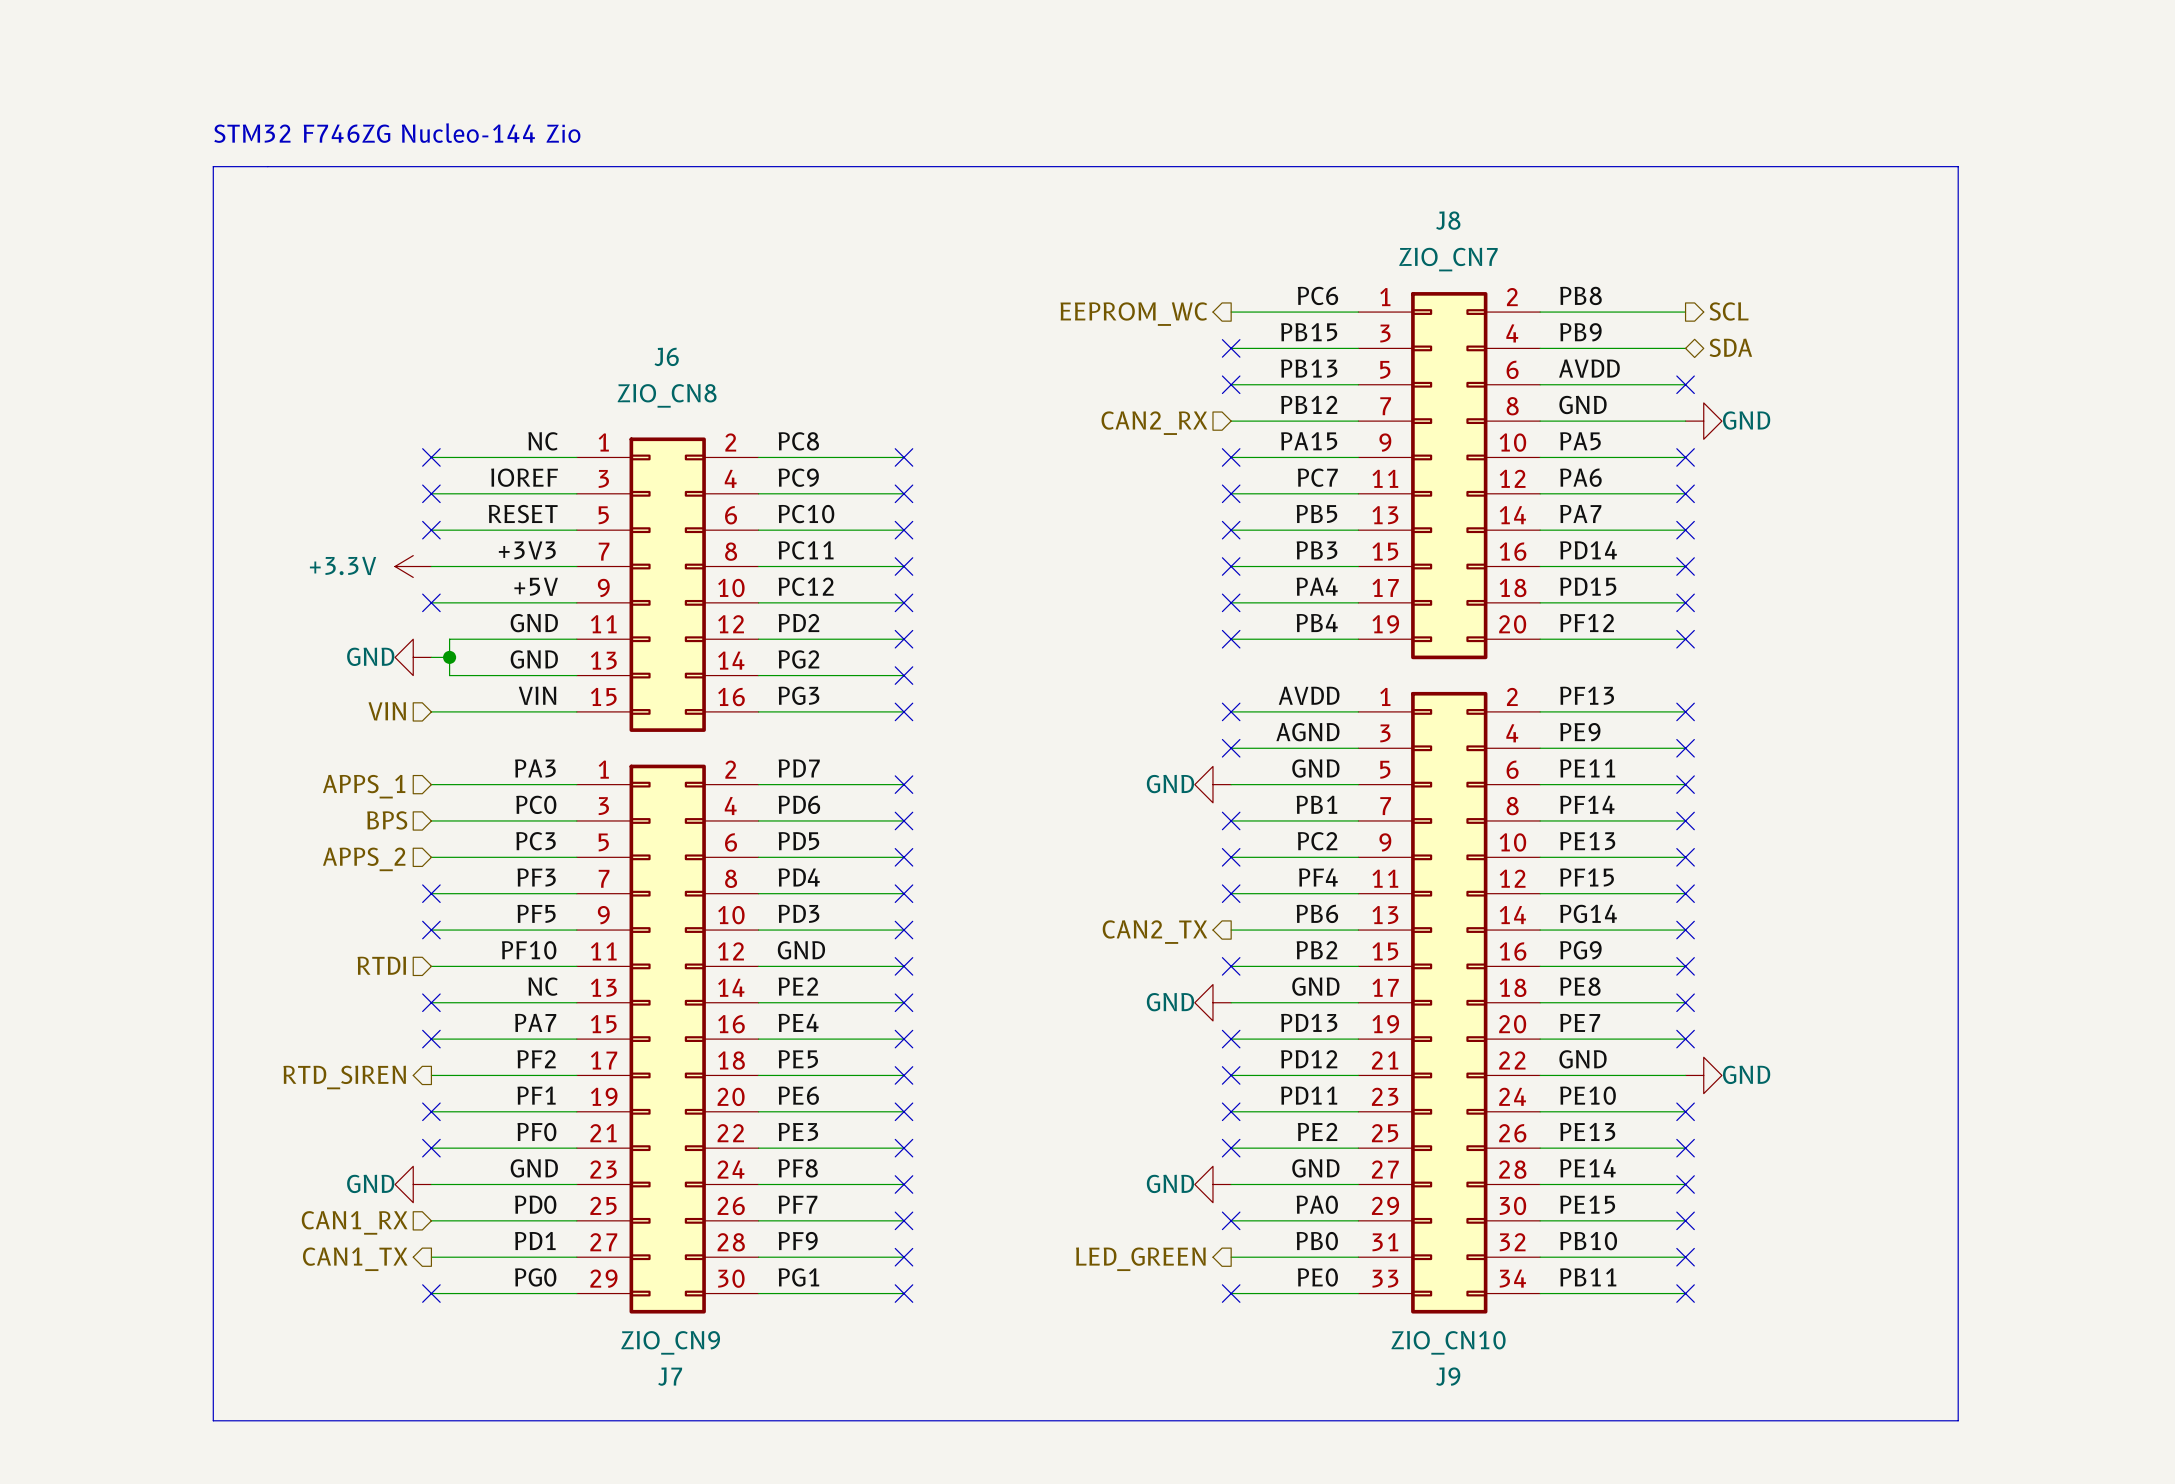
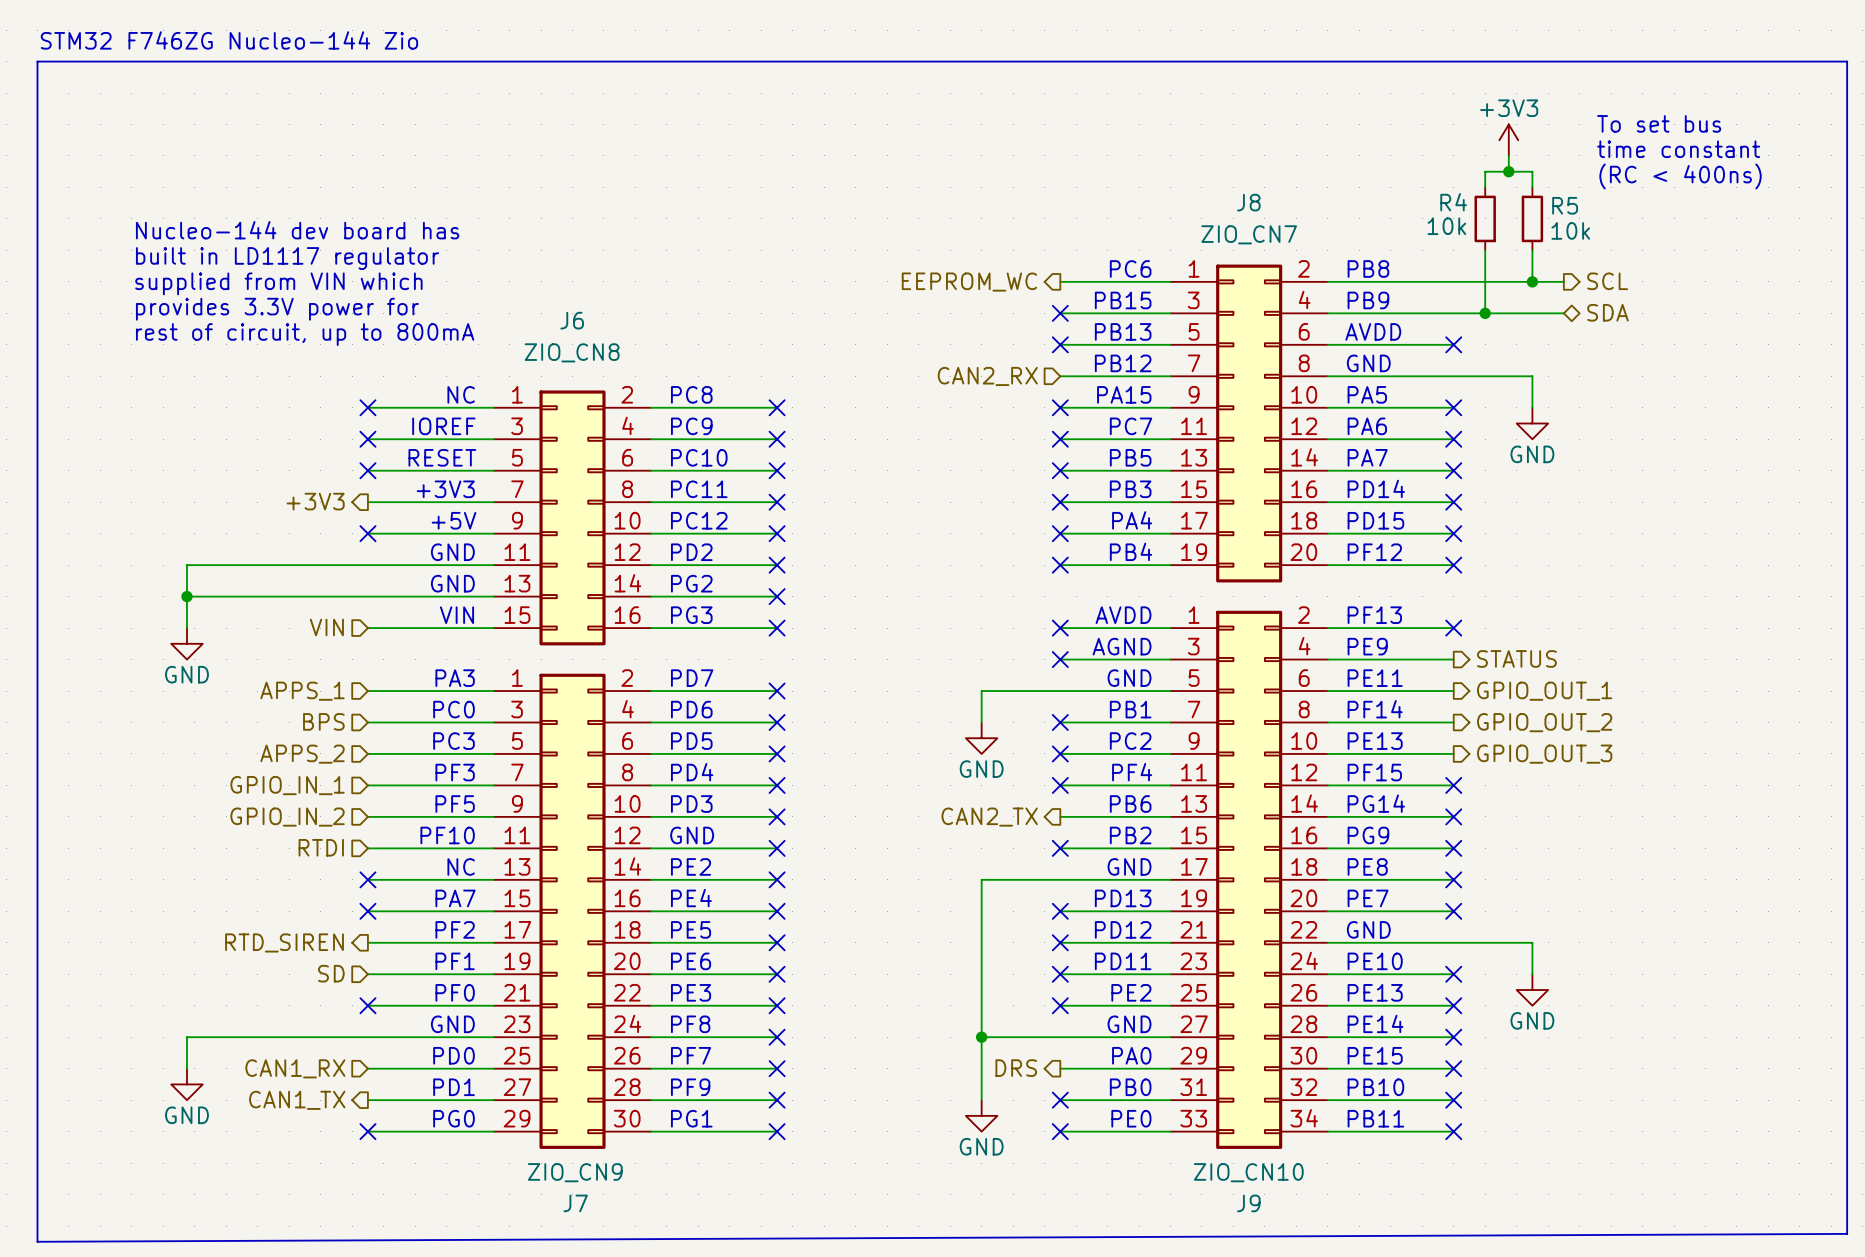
text: none -> To set bus (1659, 123)
text position: STM32 F746ZG Nucleo-144 Zio (397, 133) -> STM32 F746ZG Nucleo-144 Zio (229, 40)
power symbol: none -> +3V3 (1508, 140)
text: none -> time constant (1678, 149)
line: (213, 166) (1958, 166) (1958, 1420) (213, 1420) (213, 166) -> (37, 61) (37, 1241) (1847, 1233) (1847, 61) (37, 61)
wire: none -> (1508, 155) (1508, 171)
junction: none -> (1508, 171)
text: none -> (RC < 400ns) (1680, 176)
wire: none -> (1485, 187) (1485, 171) (1532, 171) (1532, 187)
R4: none -> 10k (1485, 218)
R5: none -> 10k (1532, 218)
text: none -> Nucleo-144 dev board has (297, 230)
wire: none -> (1485, 250) (1485, 313)
wire: none -> (1532, 250) (1532, 281)
text: none -> built in LD1117 regulator (287, 258)
label: PC6 (1317, 295) -> none
label: PB8 (1580, 295) -> none
text: none -> PC6 (1130, 268)
text: none -> PB8 (1368, 268)
hierarchical label position: SCL (1729, 311) -> SCL (1607, 281)
wire: none -> (1453, 281) (1563, 281)
junction: none -> (1532, 281)
text: none -> supplied from VIN which (278, 283)
label: PB15 (1309, 332) -> none
label: PB9 (1580, 332) -> none
text: none -> PB15 (1123, 300)
text: none -> PB9 (1368, 300)
text: none -> provides 3.3V power for (277, 309)
hierarchical label position: SDA (1730, 347) -> SDA (1607, 312)
wire: none -> (1453, 313) (1563, 313)
junction: none -> (1485, 313)
label: PB13 (1309, 368) -> none
label: AVDD (1589, 368) -> none
text: none -> PB13 (1123, 331)
text: none -> AVDD (1373, 331)
text: none -> rest of circuit, up to 800mA (305, 334)
label: PB12 (1309, 404) -> none
label: GND (1583, 404) -> none
text: none -> PB12 (1123, 363)
text: none -> GND (1368, 363)
wire: none -> (1453, 376) (1532, 376) (1532, 407)
power symbol rotation: 0° (1703, 421) -> 90° clockwise (1532, 423)
power symbol position: GND (1703, 421) -> GND (1532, 423)
label: NC (543, 441) -> none
label: PC8 (798, 441) -> none
label: PA15 (1309, 441) -> none
label: PA5 (1580, 441) -> none
text: none -> NC (461, 394)
text: none -> PC8 (691, 394)
text: none -> PA15 (1124, 394)
text: none -> PA5 (1367, 394)
label: IOREF (524, 477) -> none
label: PC9 (798, 477) -> none
label: PC7 (1317, 477) -> none
label: PA6 (1580, 477) -> none
text: none -> IOREF (443, 426)
text: none -> PC9 (691, 426)
text: none -> PC7 (1131, 426)
text: none -> PA6 (1367, 426)
label: PB5 (1316, 513) -> none
label: PA7 (1580, 513) -> none
label: RESET (523, 514) -> none
label: PC10 (806, 514) -> none
text: none -> RESET (442, 457)
text: none -> PC10 (699, 457)
text: none -> PB5 (1130, 457)
text: none -> PA7 (1367, 457)
label: +3V3 (527, 550) -> none
label: PC11 (806, 550) -> none
label: PB3 (1316, 550) -> none
label: PD14 (1588, 550) -> none
text: none -> +3V3 (445, 489)
text: none -> PC11 (699, 489)
text: none -> PB3 (1130, 489)
text: none -> PD14 (1376, 488)
hierarchical label: none -> +3V3 (315, 501)
power symbol: +3.3V (413, 566) -> none
label: +5V (536, 586) -> none
label: PC12 (806, 586) -> none
label: PA4 (1317, 586) -> none
label: PD15 (1588, 586) -> none
text: none -> PA4 (1132, 520)
text: none -> PD15 (1375, 520)
text: none -> +5V (454, 520)
text: none -> PC12 (699, 520)
label: PB4 (1317, 622) -> none
label: PF12 (1587, 622) -> none
label: GND (534, 623) -> none
label: PD2 (798, 623) -> none
text: none -> GND (452, 552)
text: none -> PD2 (691, 552)
text: none -> PB4 (1131, 551)
text: none -> PF12 (1374, 552)
wire: (449, 639) (449, 675) -> (383, 565) (186, 565) (186, 628)
power symbol rotation: 0° (413, 657) -> 90° counterclockwise (186, 643)
power symbol position: GND (413, 657) -> GND (186, 643)
wire: (431, 657) (449, 657) -> none
junction: (449, 657) -> none
label: GND (534, 659) -> none
label: PG2 (798, 659) -> none
text: none -> GND (452, 583)
text: none -> PG2 (691, 583)
wire: none -> (186, 596) (383, 596)
junction: none -> (186, 596)
label: VIN (537, 695) -> none
label: PG3 (798, 695) -> none
label: AVDD (1309, 695) -> none
label: PF13 (1587, 695) -> none
text: none -> VIN (457, 615)
text: none -> PG3 (691, 615)
text: none -> AVDD (1123, 615)
text: none -> PF13 (1374, 615)
label: AGND (1307, 732) -> none
label: PE9 (1580, 732) -> none
text: none -> AGND (1122, 646)
text: none -> PE9 (1367, 646)
hierarchical label: none -> STATUS (1516, 658)
no-connect mark: (1685, 748) -> none
label: PA3 (535, 768) -> none
label: PD7 (799, 768) -> none
label: GND (1315, 768) -> none
label: PE11 (1587, 768) -> none
text: none -> PA3 (455, 678)
text: none -> PD7 (692, 678)
text: none -> GND (1129, 678)
text: none -> PE11 (1375, 678)
power symbol: GND (1212, 784) -> none
wire: none -> (1060, 691) (981, 691) (981, 722)
no-connect mark: (1685, 784) -> none
hierarchical label: none -> GPIO_OUT_1 (1544, 691)
label: PC0 (536, 804) -> none
label: PD6 (799, 804) -> none
label: PB1 (1316, 804) -> none
label: PF14 (1587, 804) -> none
text: none -> PC0 (454, 709)
text: none -> PD6 (691, 709)
text: none -> PB1 (1130, 709)
text: none -> PF14 (1375, 709)
no-connect mark: (1685, 820) -> none
hierarchical label: none -> GPIO_OUT_2 (1544, 722)
power symbol: none -> GND (981, 738)
label: PC3 (536, 841) -> none
label: PD5 (798, 841) -> none
label: PC2 (1317, 841) -> none
label: PE13 (1587, 841) -> none
text: none -> PC3 (454, 741)
text: none -> PD5 (691, 741)
text: none -> PC2 (1130, 741)
text: none -> PE13 (1375, 741)
no-connect mark: (1685, 857) -> none
hierarchical label: none -> GPIO_OUT_3 (1544, 754)
label: PF3 (536, 877) -> none
label: PD4 (799, 877) -> none
label: PF4 (1318, 877) -> none
label: PF15 (1587, 877) -> none
text: none -> PF3 (455, 772)
text: none -> PD4 (692, 772)
text: none -> PF4 (1132, 772)
text: none -> PF15 (1374, 772)
no-connect mark: (431, 893) -> none
hierarchical label: none -> GPIO_IN_1 (287, 785)
label: PF5 (536, 913) -> none
label: PD3 (798, 913) -> none
label: PB6 (1317, 913) -> none
label: PG14 (1588, 913) -> none
text: none -> PF5 (455, 804)
text: none -> PD3 (691, 804)
text: none -> PB6 (1130, 804)
text: none -> PG14 (1376, 803)
no-connect mark: (431, 930) -> none
hierarchical label: none -> GPIO_IN_2 (287, 817)
label: PF10 (529, 950) -> none
label: GND (801, 950) -> none
label: PB2 (1316, 950) -> none
label: PG9 (1580, 950) -> none
text: none -> PF10 (447, 835)
text: none -> GND (692, 835)
text: none -> PB2 (1130, 835)
text: none -> PG9 (1368, 835)
label: NC (543, 986) -> none
label: PE2 (798, 986) -> none
label: GND (1315, 986) -> none
label: PE8 (1580, 986) -> none
text: none -> NC (461, 866)
text: none -> PE2 (691, 866)
text: none -> GND (1129, 866)
text: none -> PE8 (1367, 866)
power symbol: GND (1212, 1002) -> none
wire: none -> (1060, 879) (981, 879) (981, 1100)
label: PA7 (535, 1022) -> none
label: PE4 (798, 1022) -> none
label: PD13 (1309, 1022) -> none
label: PE7 (1580, 1022) -> none
text: none -> PA7 (455, 898)
text: none -> PE4 (691, 898)
text: none -> PD13 (1123, 898)
text: none -> PE7 (1368, 898)
label: PF2 (536, 1059) -> none
label: PE5 (798, 1059) -> none
label: PD12 (1309, 1059) -> none
label: GND (1583, 1059) -> none
text: none -> PF2 (455, 929)
text: none -> PE5 (691, 929)
text: none -> PD12 (1123, 929)
text: none -> GND (1368, 929)
wire: none -> (1453, 942) (1532, 942) (1532, 974)
power symbol rotation: 0° (1703, 1075) -> 90° clockwise (1532, 990)
power symbol position: GND (1703, 1075) -> GND (1532, 990)
label: PF1 (536, 1095) -> none
label: PE6 (798, 1095) -> none
label: PD11 (1309, 1095) -> none
label: PE10 (1588, 1095) -> none
text: none -> PF1 (455, 961)
text: none -> PD11 (1123, 961)
text: none -> PE6 (691, 961)
text: none -> PE10 (1375, 961)
hierarchical label: none -> SD (331, 973)
no-connect mark: (431, 1111) -> none
label: PE3 (798, 1131) -> none
label: PE2 (1317, 1131) -> none
label: PE13 (1587, 1131) -> none
label: PF0 (536, 1132) -> none
text: none -> PF0 (455, 992)
text: none -> PE3 (691, 992)
text: none -> PE2 (1131, 992)
text: none -> PE13 (1375, 992)
label: GND (534, 1168) -> none
label: PF8 (798, 1168) -> none
label: GND (1315, 1168) -> none
label: PE14 (1587, 1168) -> none
text: none -> GND (452, 1024)
text: none -> PF8 (690, 1024)
text: none -> GND (1129, 1024)
text: none -> PE14 (1375, 1023)
power symbol rotation: 0° (413, 1184) -> 90° counterclockwise (186, 1084)
power symbol position: GND (413, 1184) -> GND (186, 1084)
wire: none -> (367, 1037) (186, 1037) (186, 1068)
wire: none -> (981, 1037) (1060, 1037)
junction: none -> (981, 1037)
power symbol rotation: 0° (1212, 1184) -> 90° counterclockwise (981, 1115)
power symbol position: GND (1212, 1184) -> GND (981, 1115)
label: PD0 (535, 1204) -> none
label: PF7 (798, 1204) -> none
label: PA0 (1317, 1204) -> none
label: PE15 (1587, 1204) -> none
text: none -> PE15 (1375, 1055)
text: none -> PD0 (454, 1055)
text: none -> PF7 (691, 1055)
text: none -> PA0 (1131, 1055)
hierarchical label: none -> DRS (1016, 1068)
no-connect mark position: (1231, 1220) -> (1060, 1100)
label: PD1 (535, 1240) -> none
label: PF9 (798, 1241) -> none
label: PB0 (1317, 1241) -> none
label: PB10 (1588, 1241) -> none
text: none -> PD1 (454, 1087)
text: none -> PF9 (690, 1087)
text: none -> PB0 (1130, 1087)
text: none -> PB10 (1375, 1087)
hierarchical label: LED_GREEN (1140, 1259) -> none
label: PG0 (535, 1277) -> none
label: PG1 (798, 1277) -> none
label: PE0 (1317, 1277) -> none
label: PB11 (1588, 1277) -> none
text: none -> PG0 (454, 1118)
text: none -> PG1 (691, 1118)
text: none -> PE0 (1131, 1118)
text: none -> PB11 (1375, 1118)

